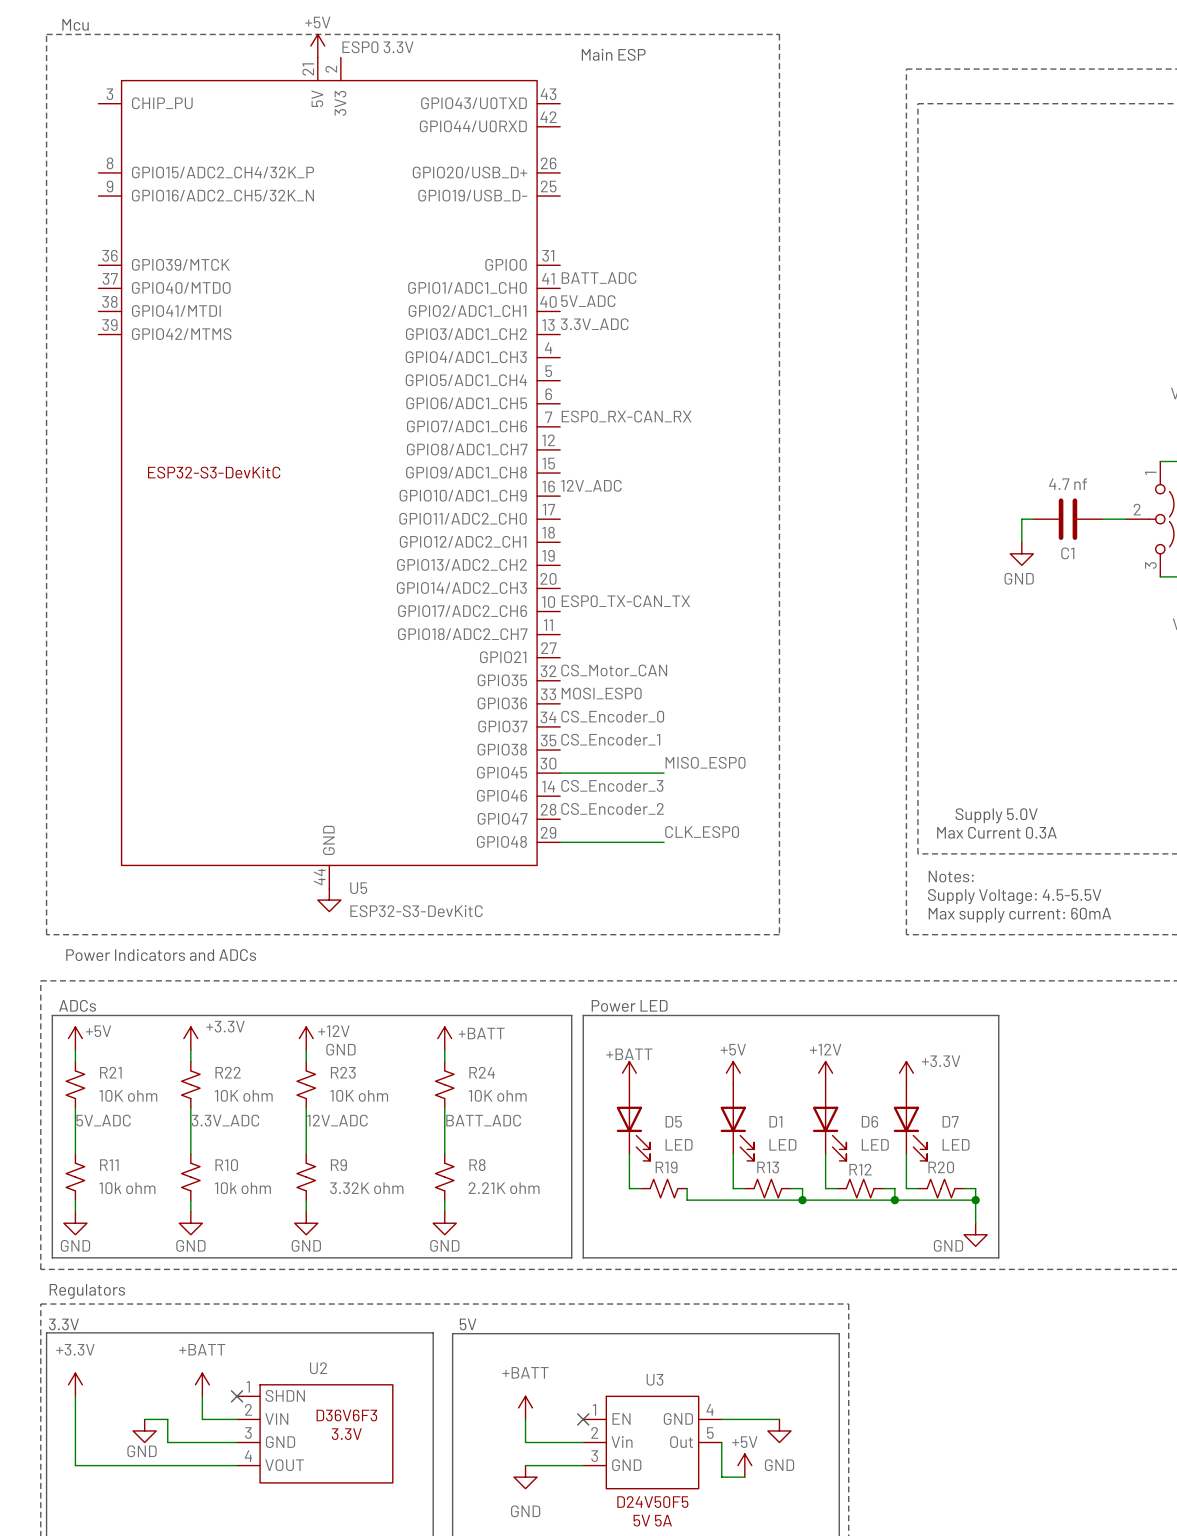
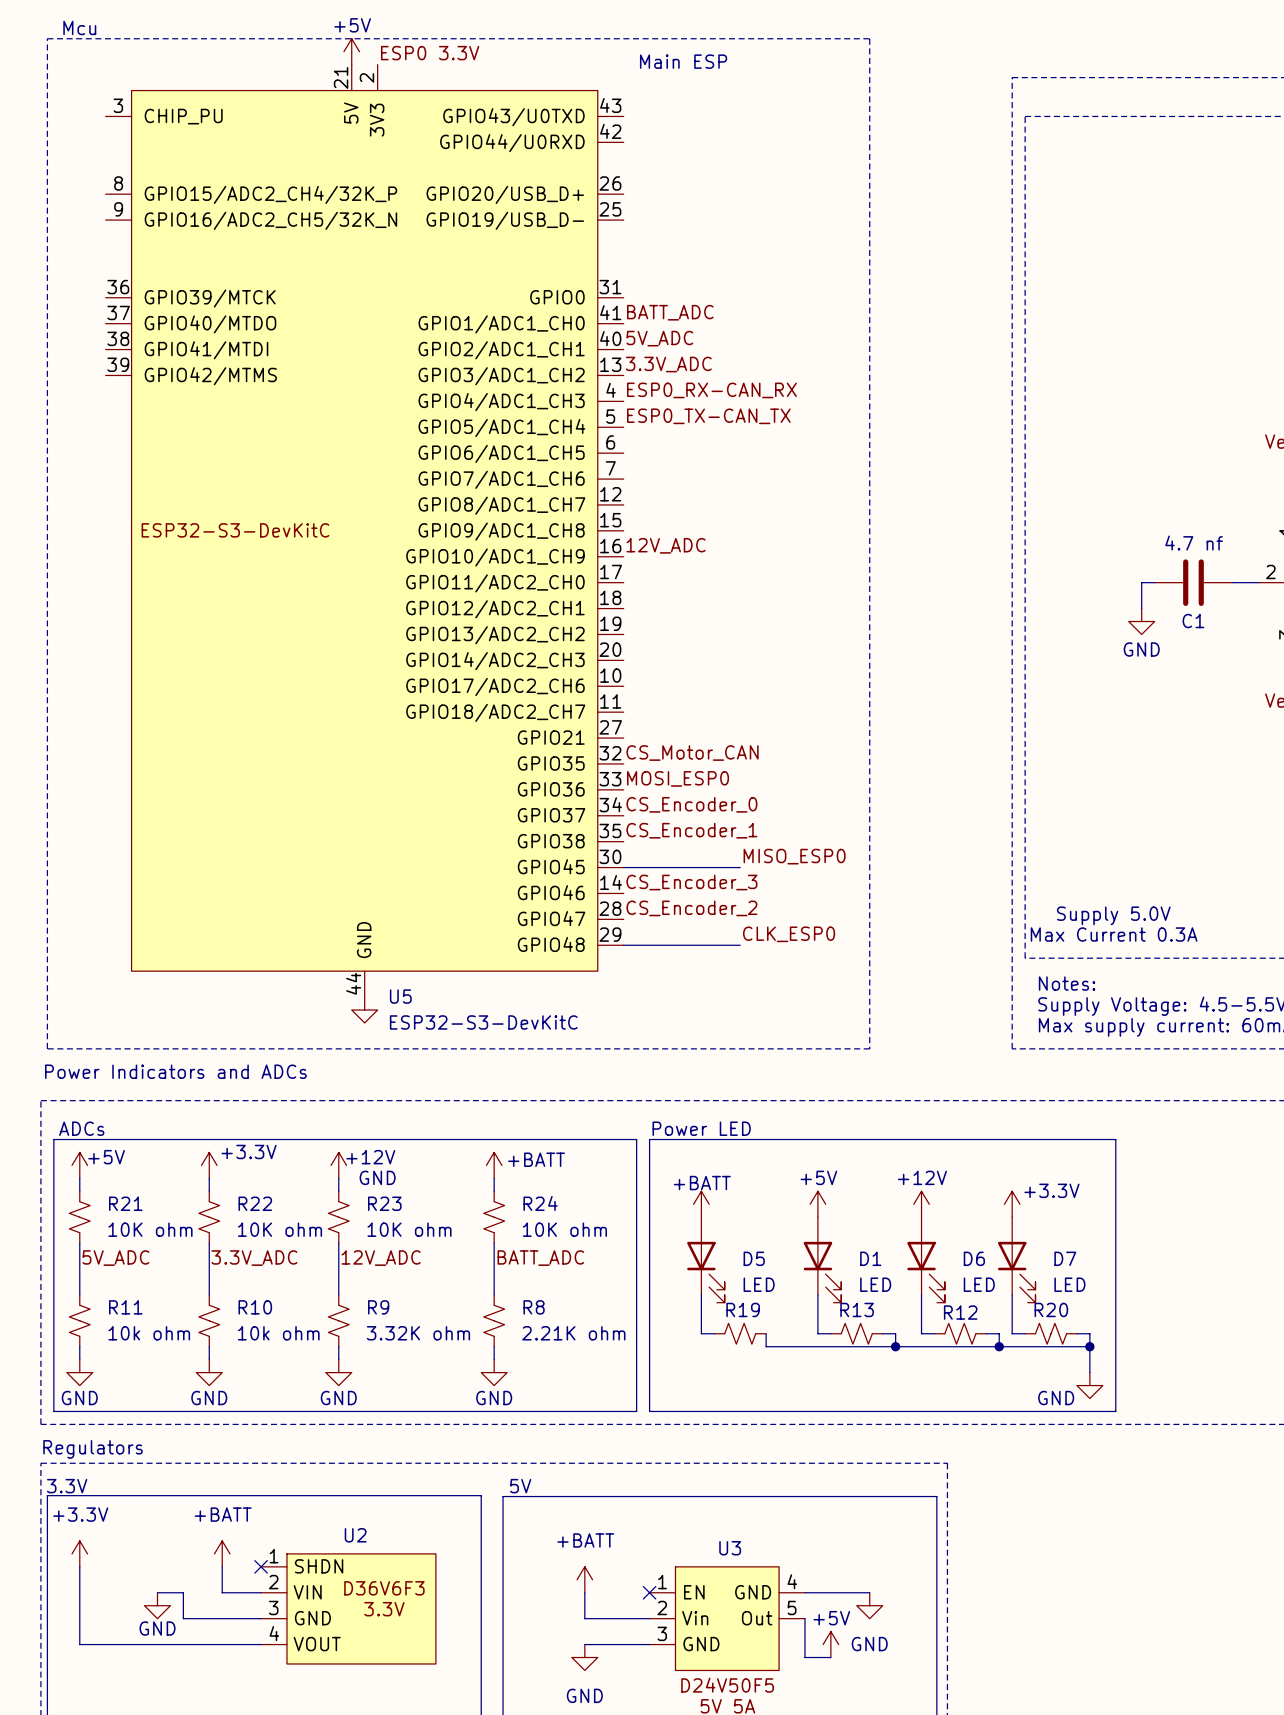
label: none -> ESP0_TX-CAN_TX (708, 416)
label position: ESP0_RX-CAN_RX (626, 416) -> ESP0_RX-CAN_RX (711, 390)
label: ESP0_TX-CAN_TX (625, 601) -> none

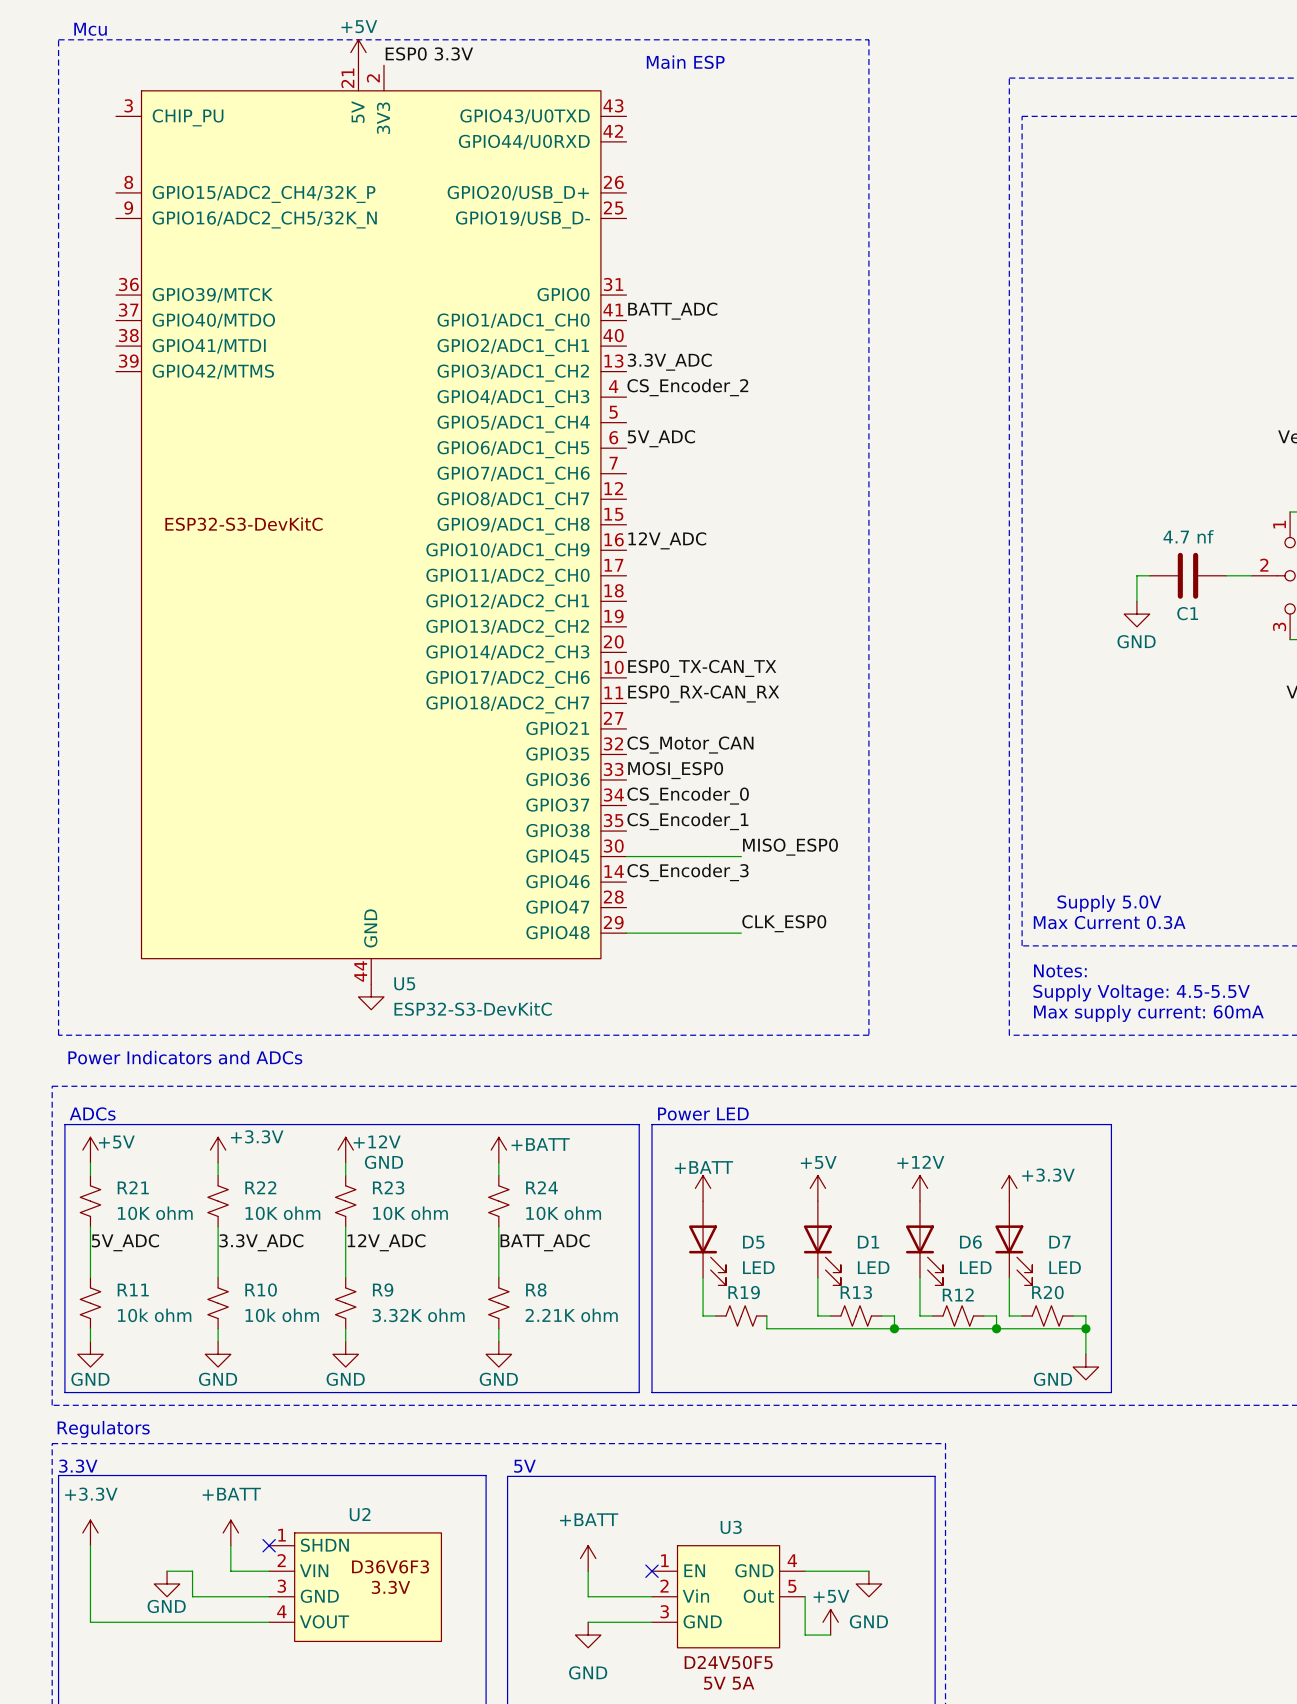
label position: 5V_ADC (659, 338) -> 5V_ADC (661, 438)
label: ESP0_RX-CAN_RX (711, 390) -> CS_Encoder_2 (687, 387)
label: ESP0_TX-CAN_TX (708, 416) -> none
label: none -> ESP0_TX-CAN_TX (702, 668)
label: none -> ESP0_RX-CAN_RX (703, 693)
label: CS_Encoder_2 (691, 908) -> none

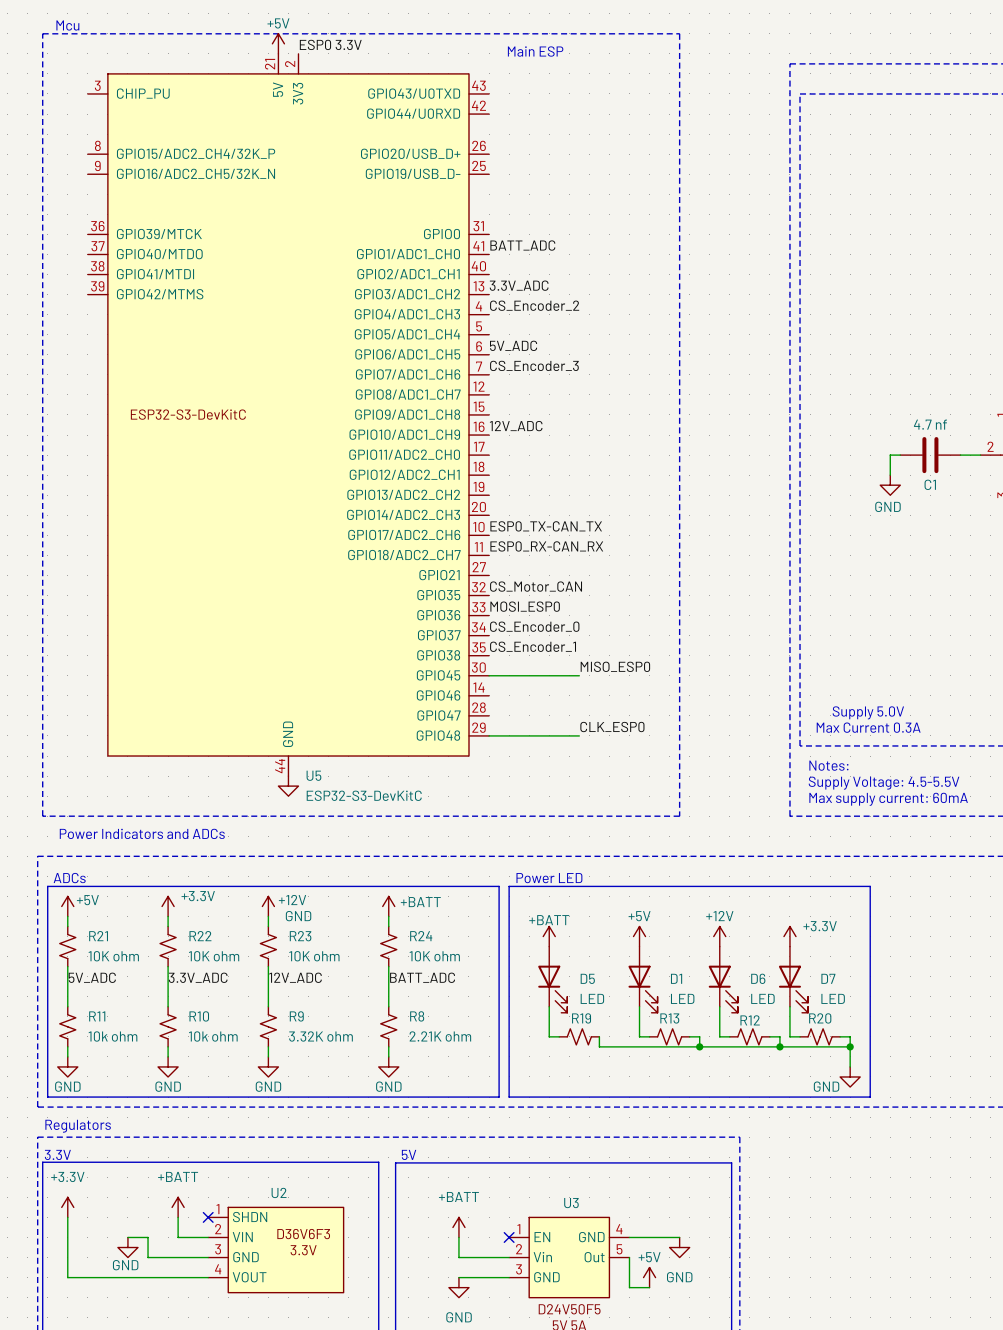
label: none -> CS_Encoder_3 (534, 365)
label: CS_Encoder_3 (688, 872) -> none

